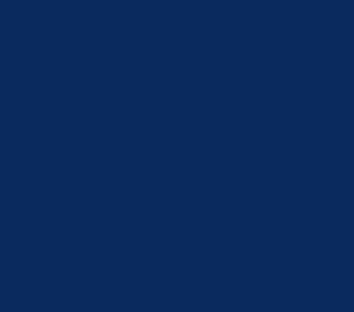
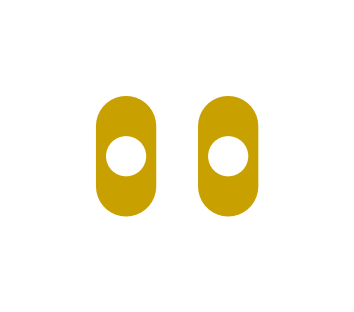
part: none -> (177, 156)

